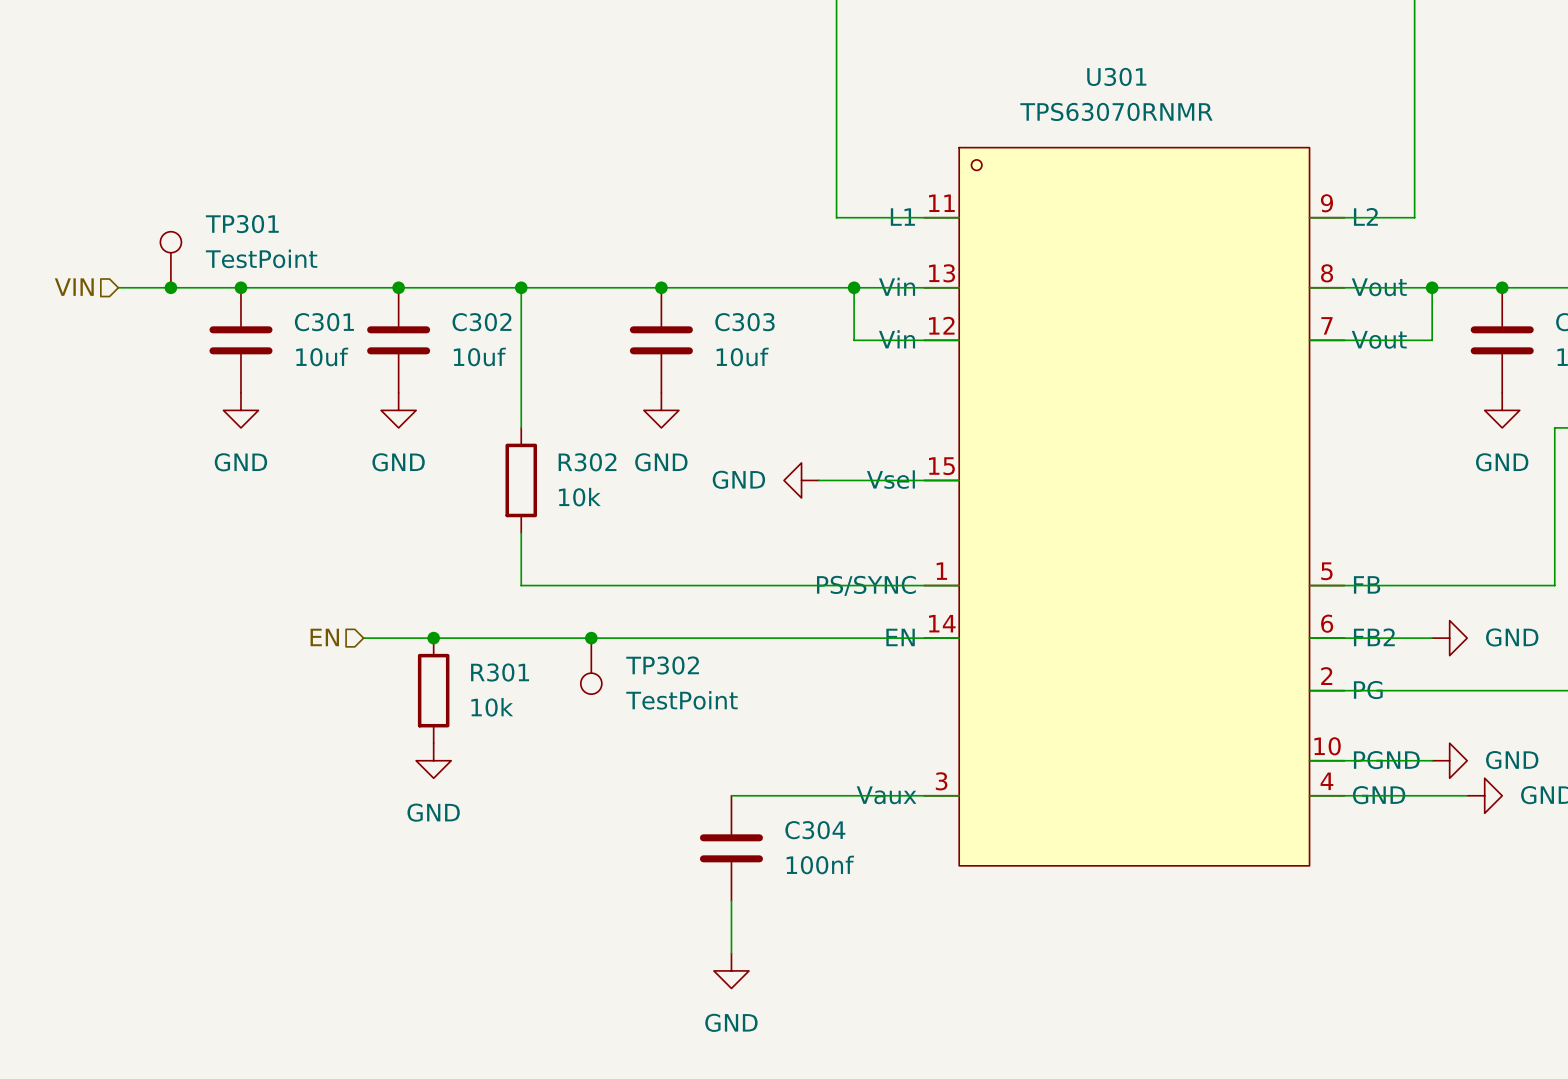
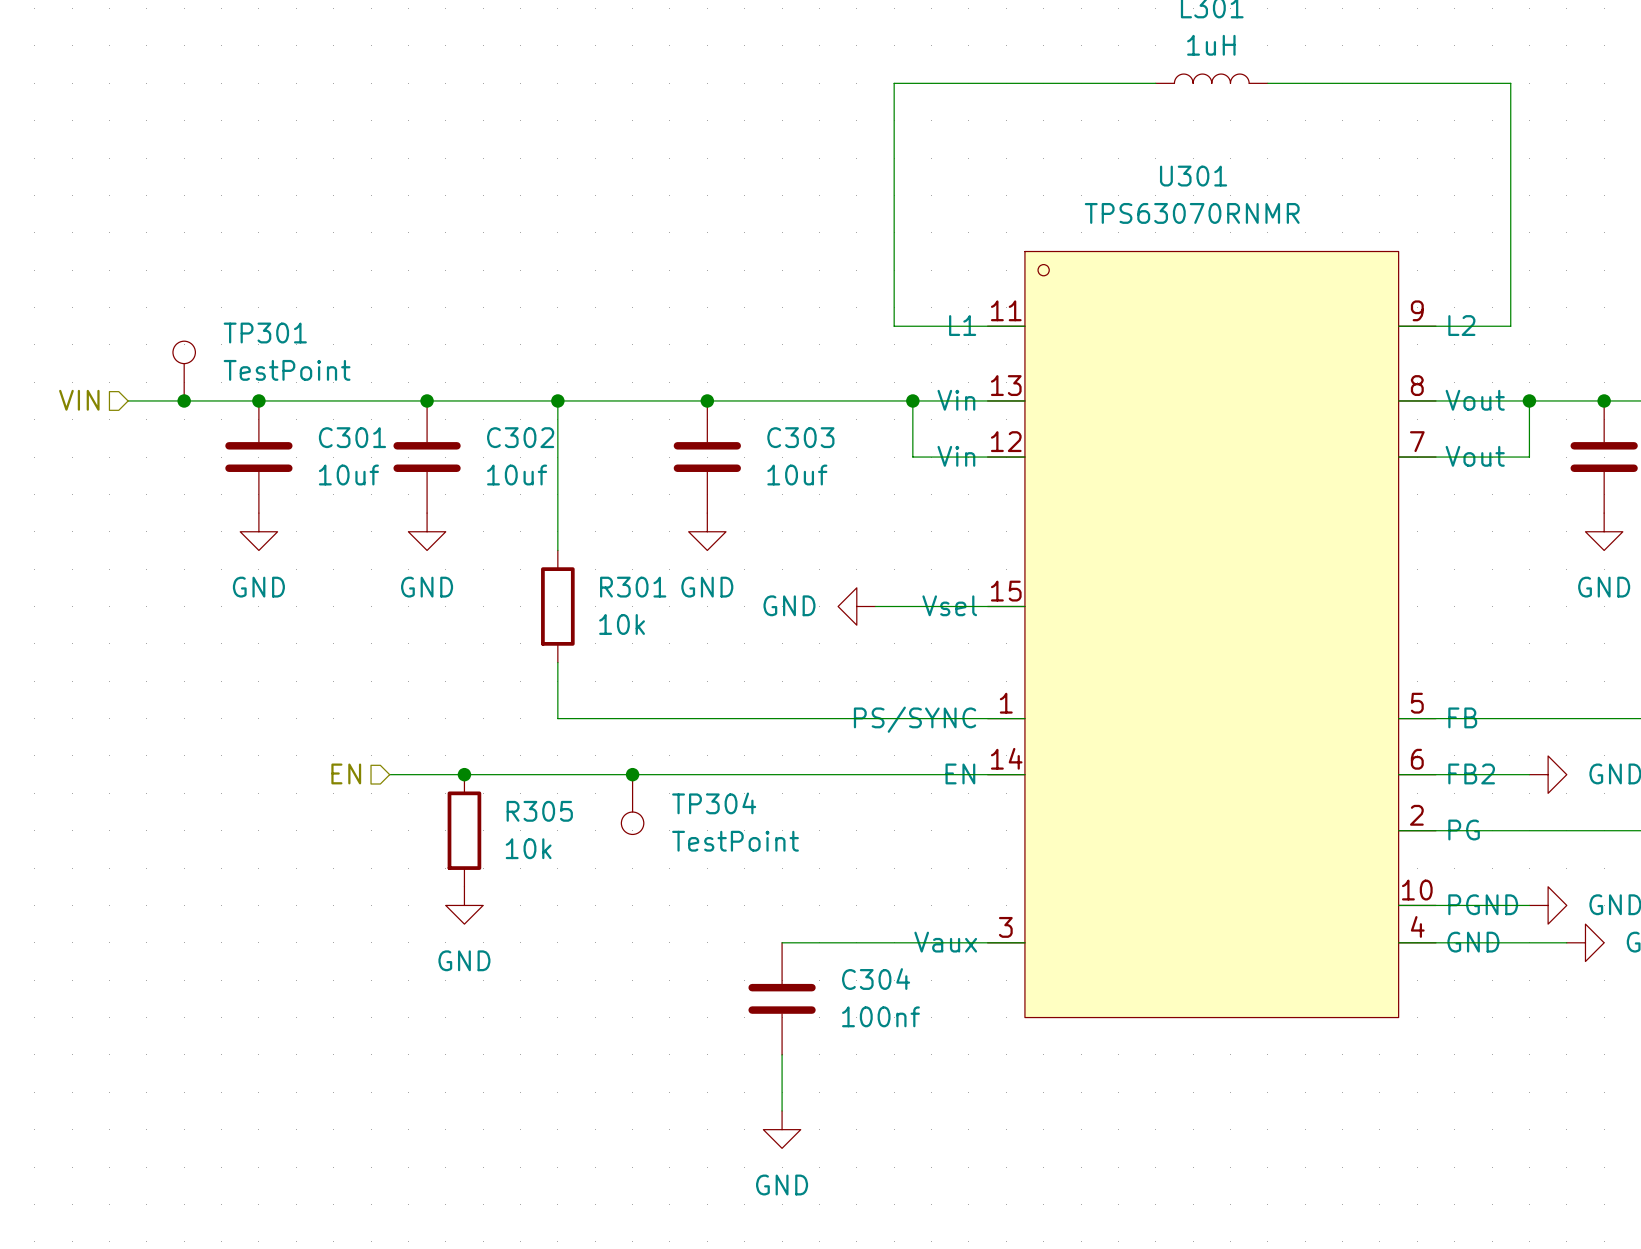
R302 name: R302 (587, 462) -> R301 (633, 587)
TP302 name: TP302 (662, 665) -> TP304 (714, 803)
R301 name: R301 (500, 672) -> R305 (539, 811)

